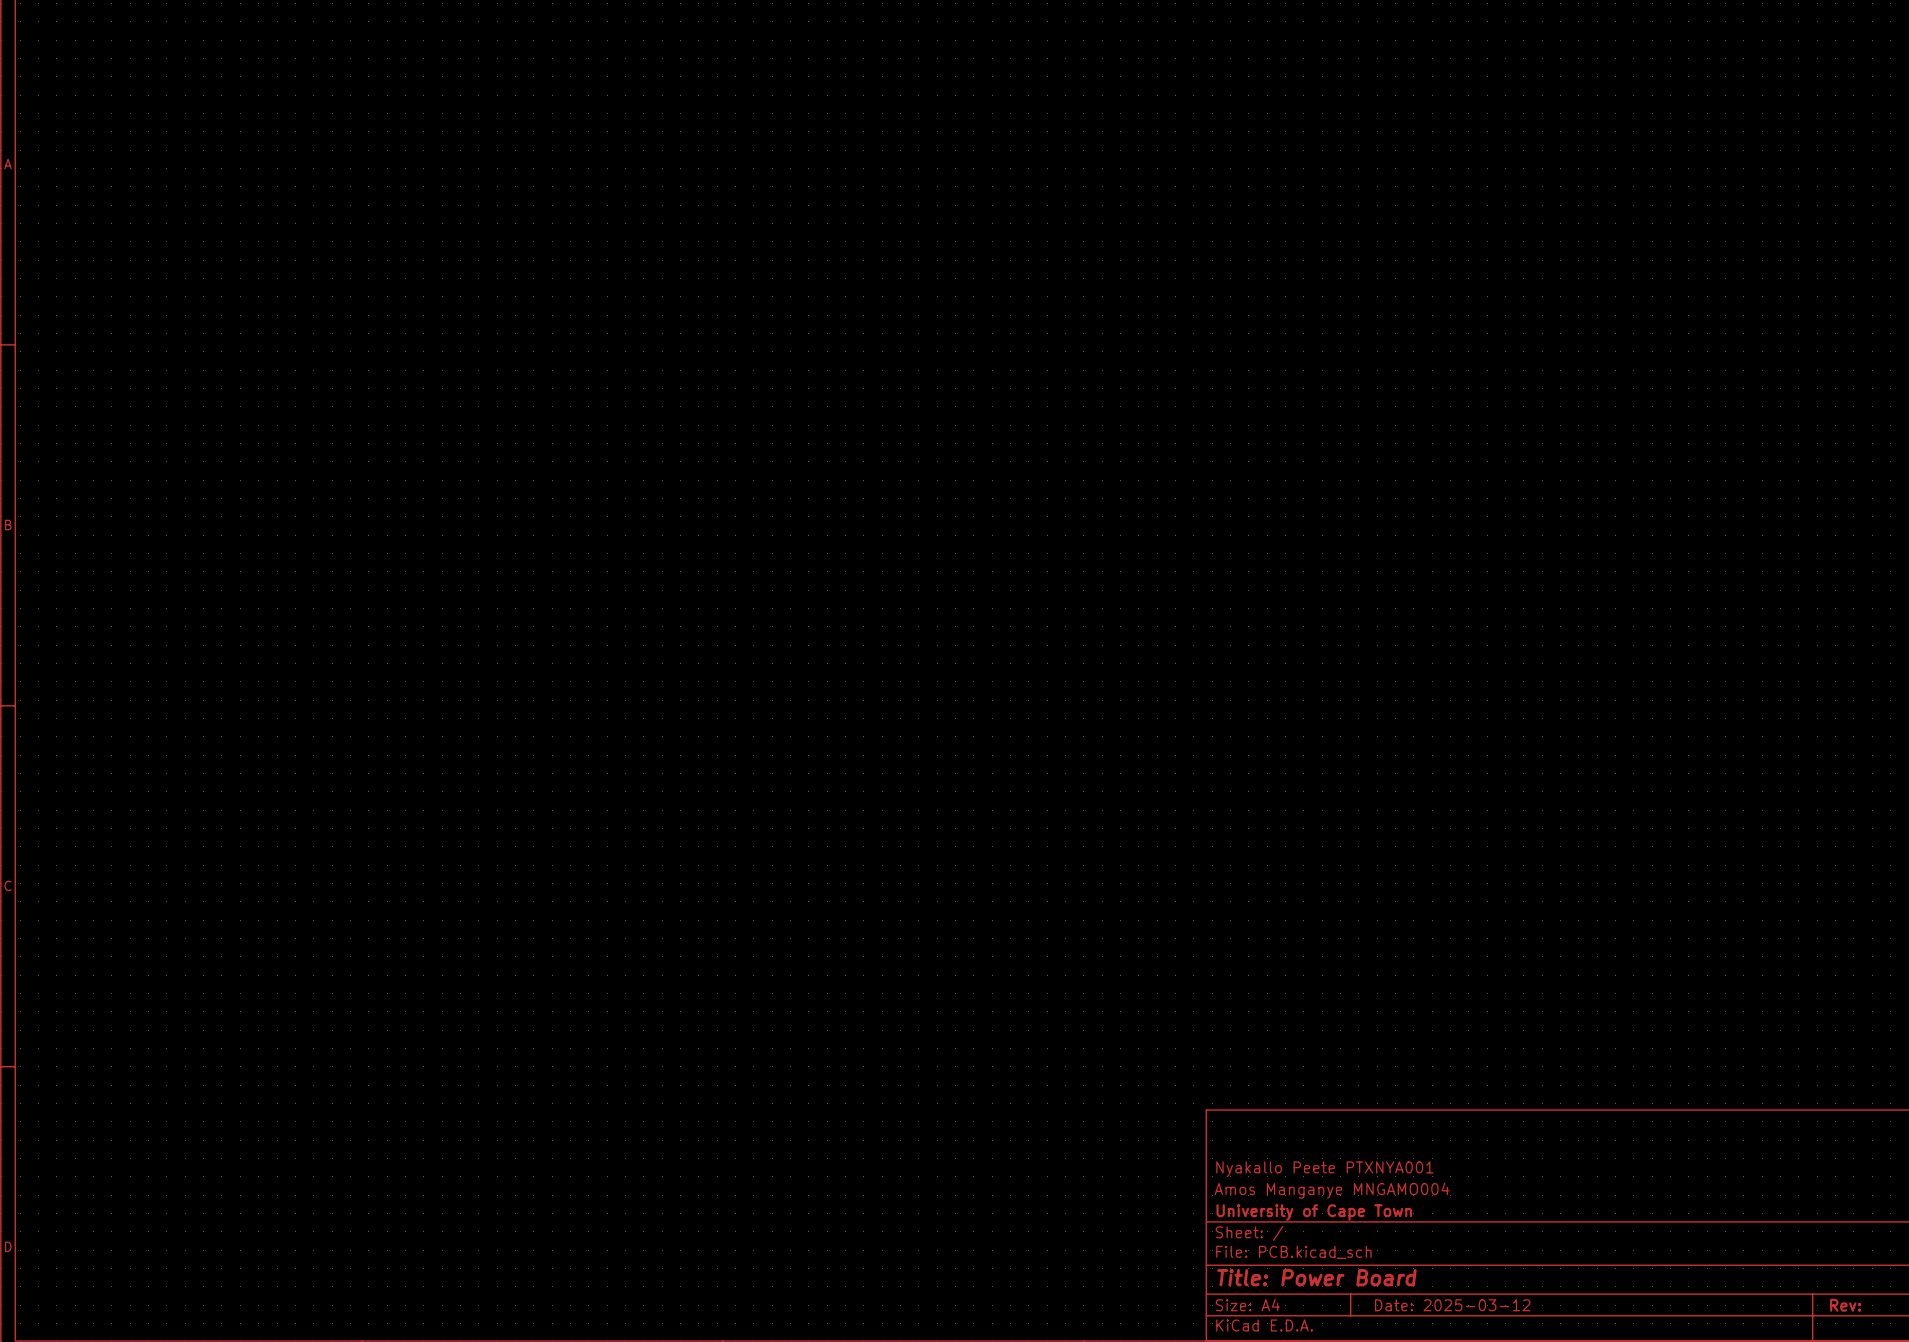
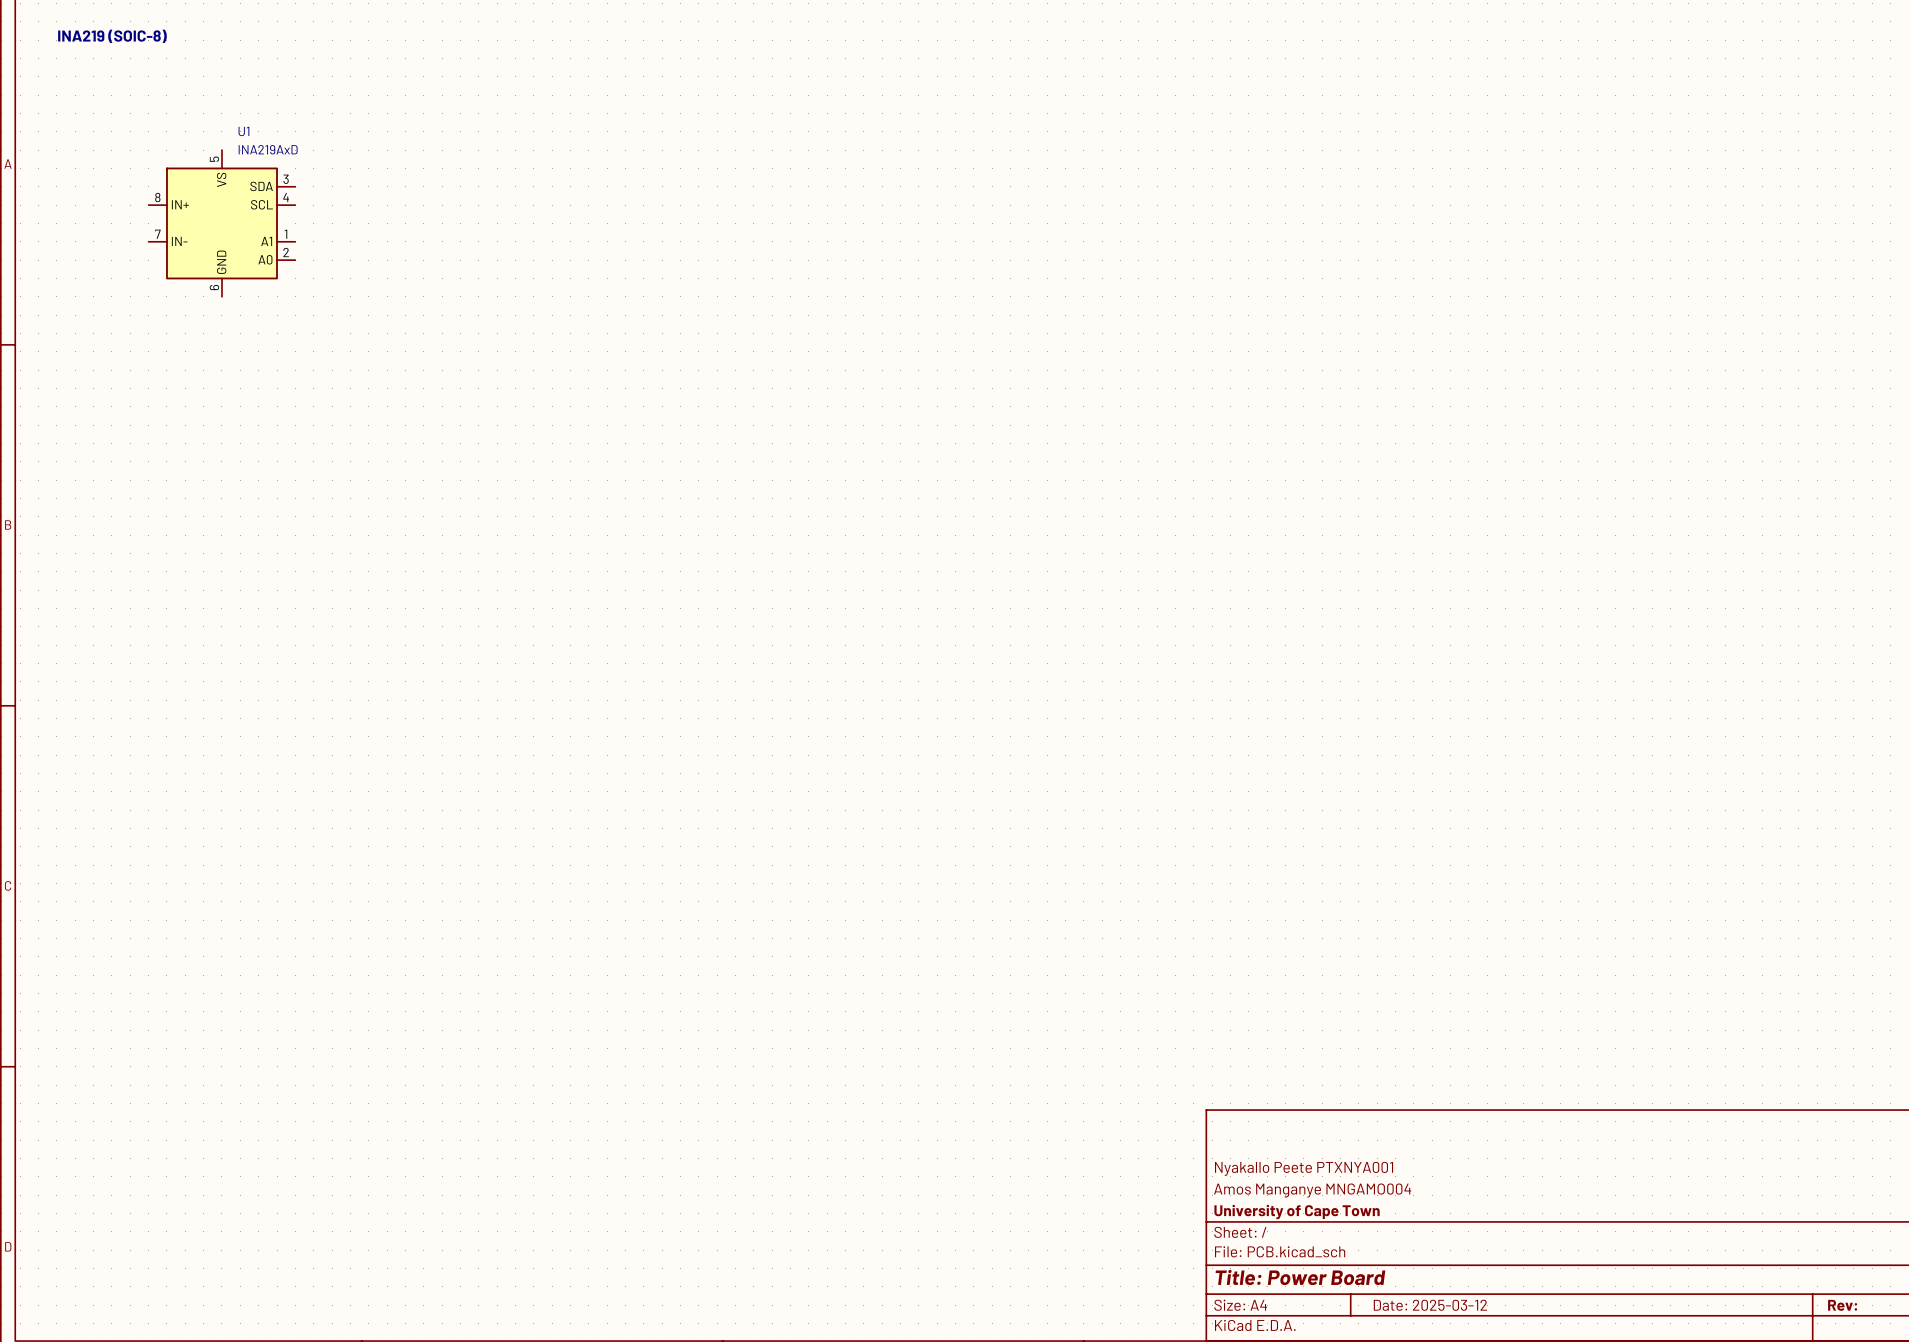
text: none -> INA219 (SOIC-8) (112, 36)
U1: none -> INA219AxD (221, 223)

